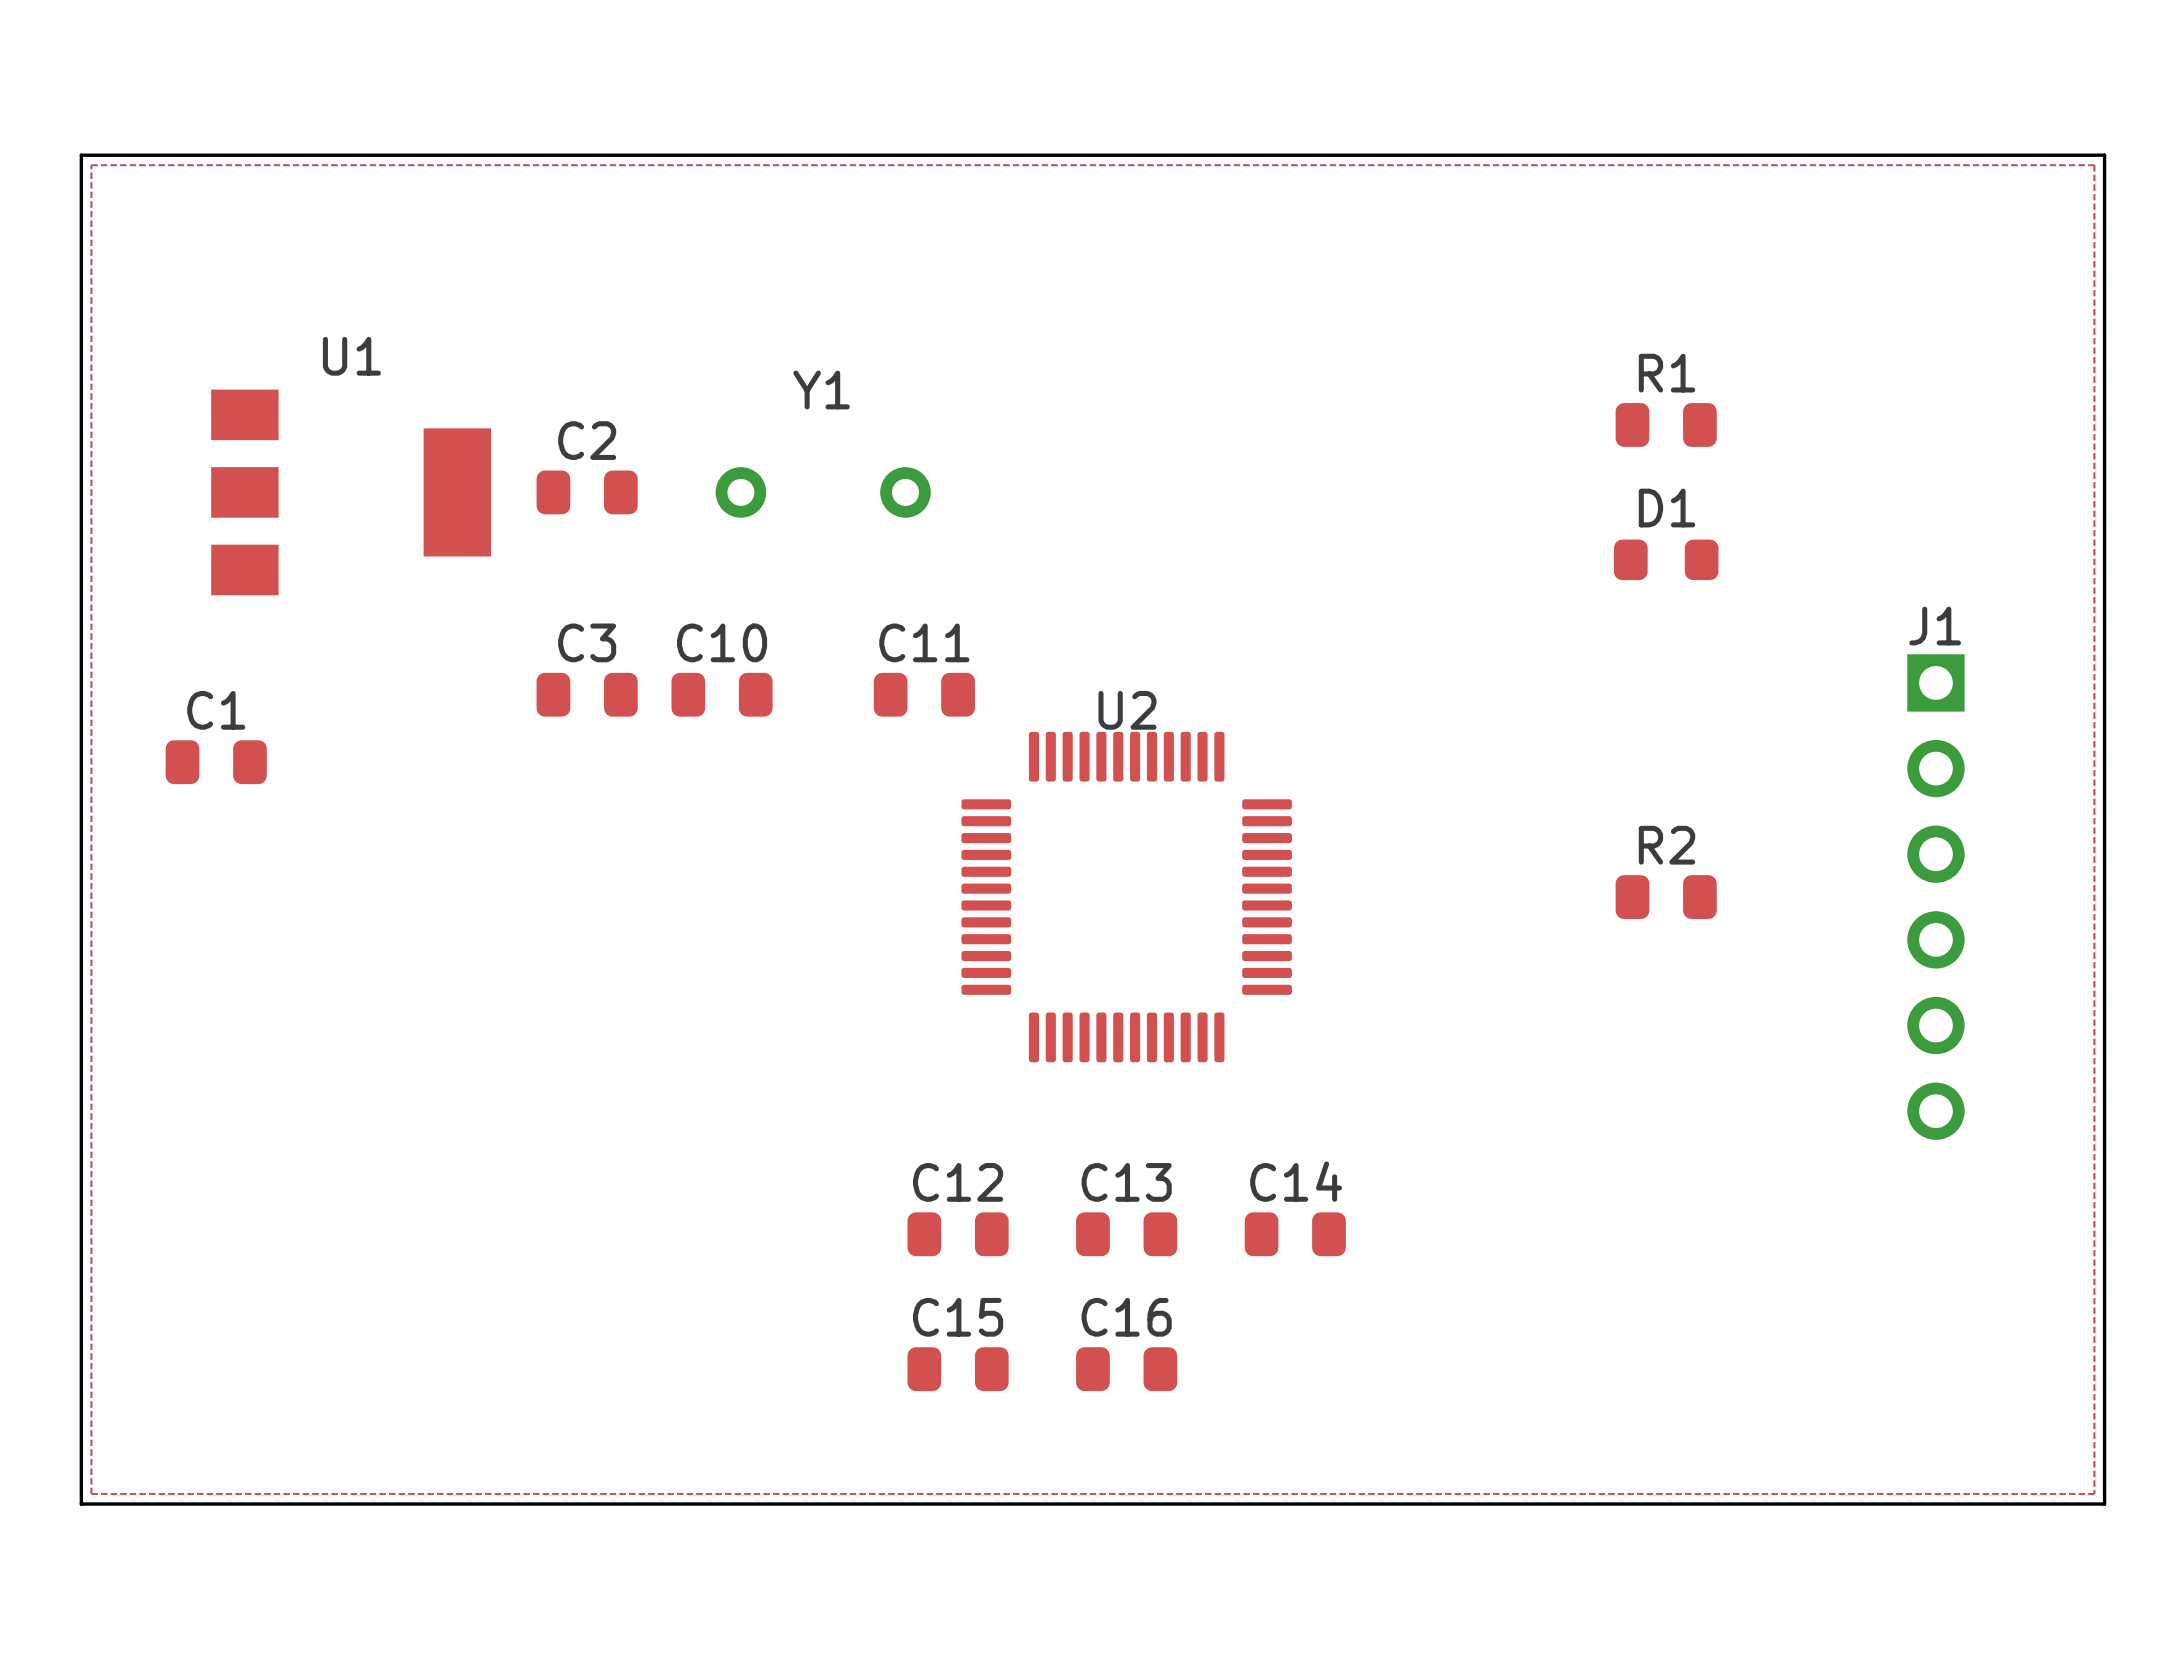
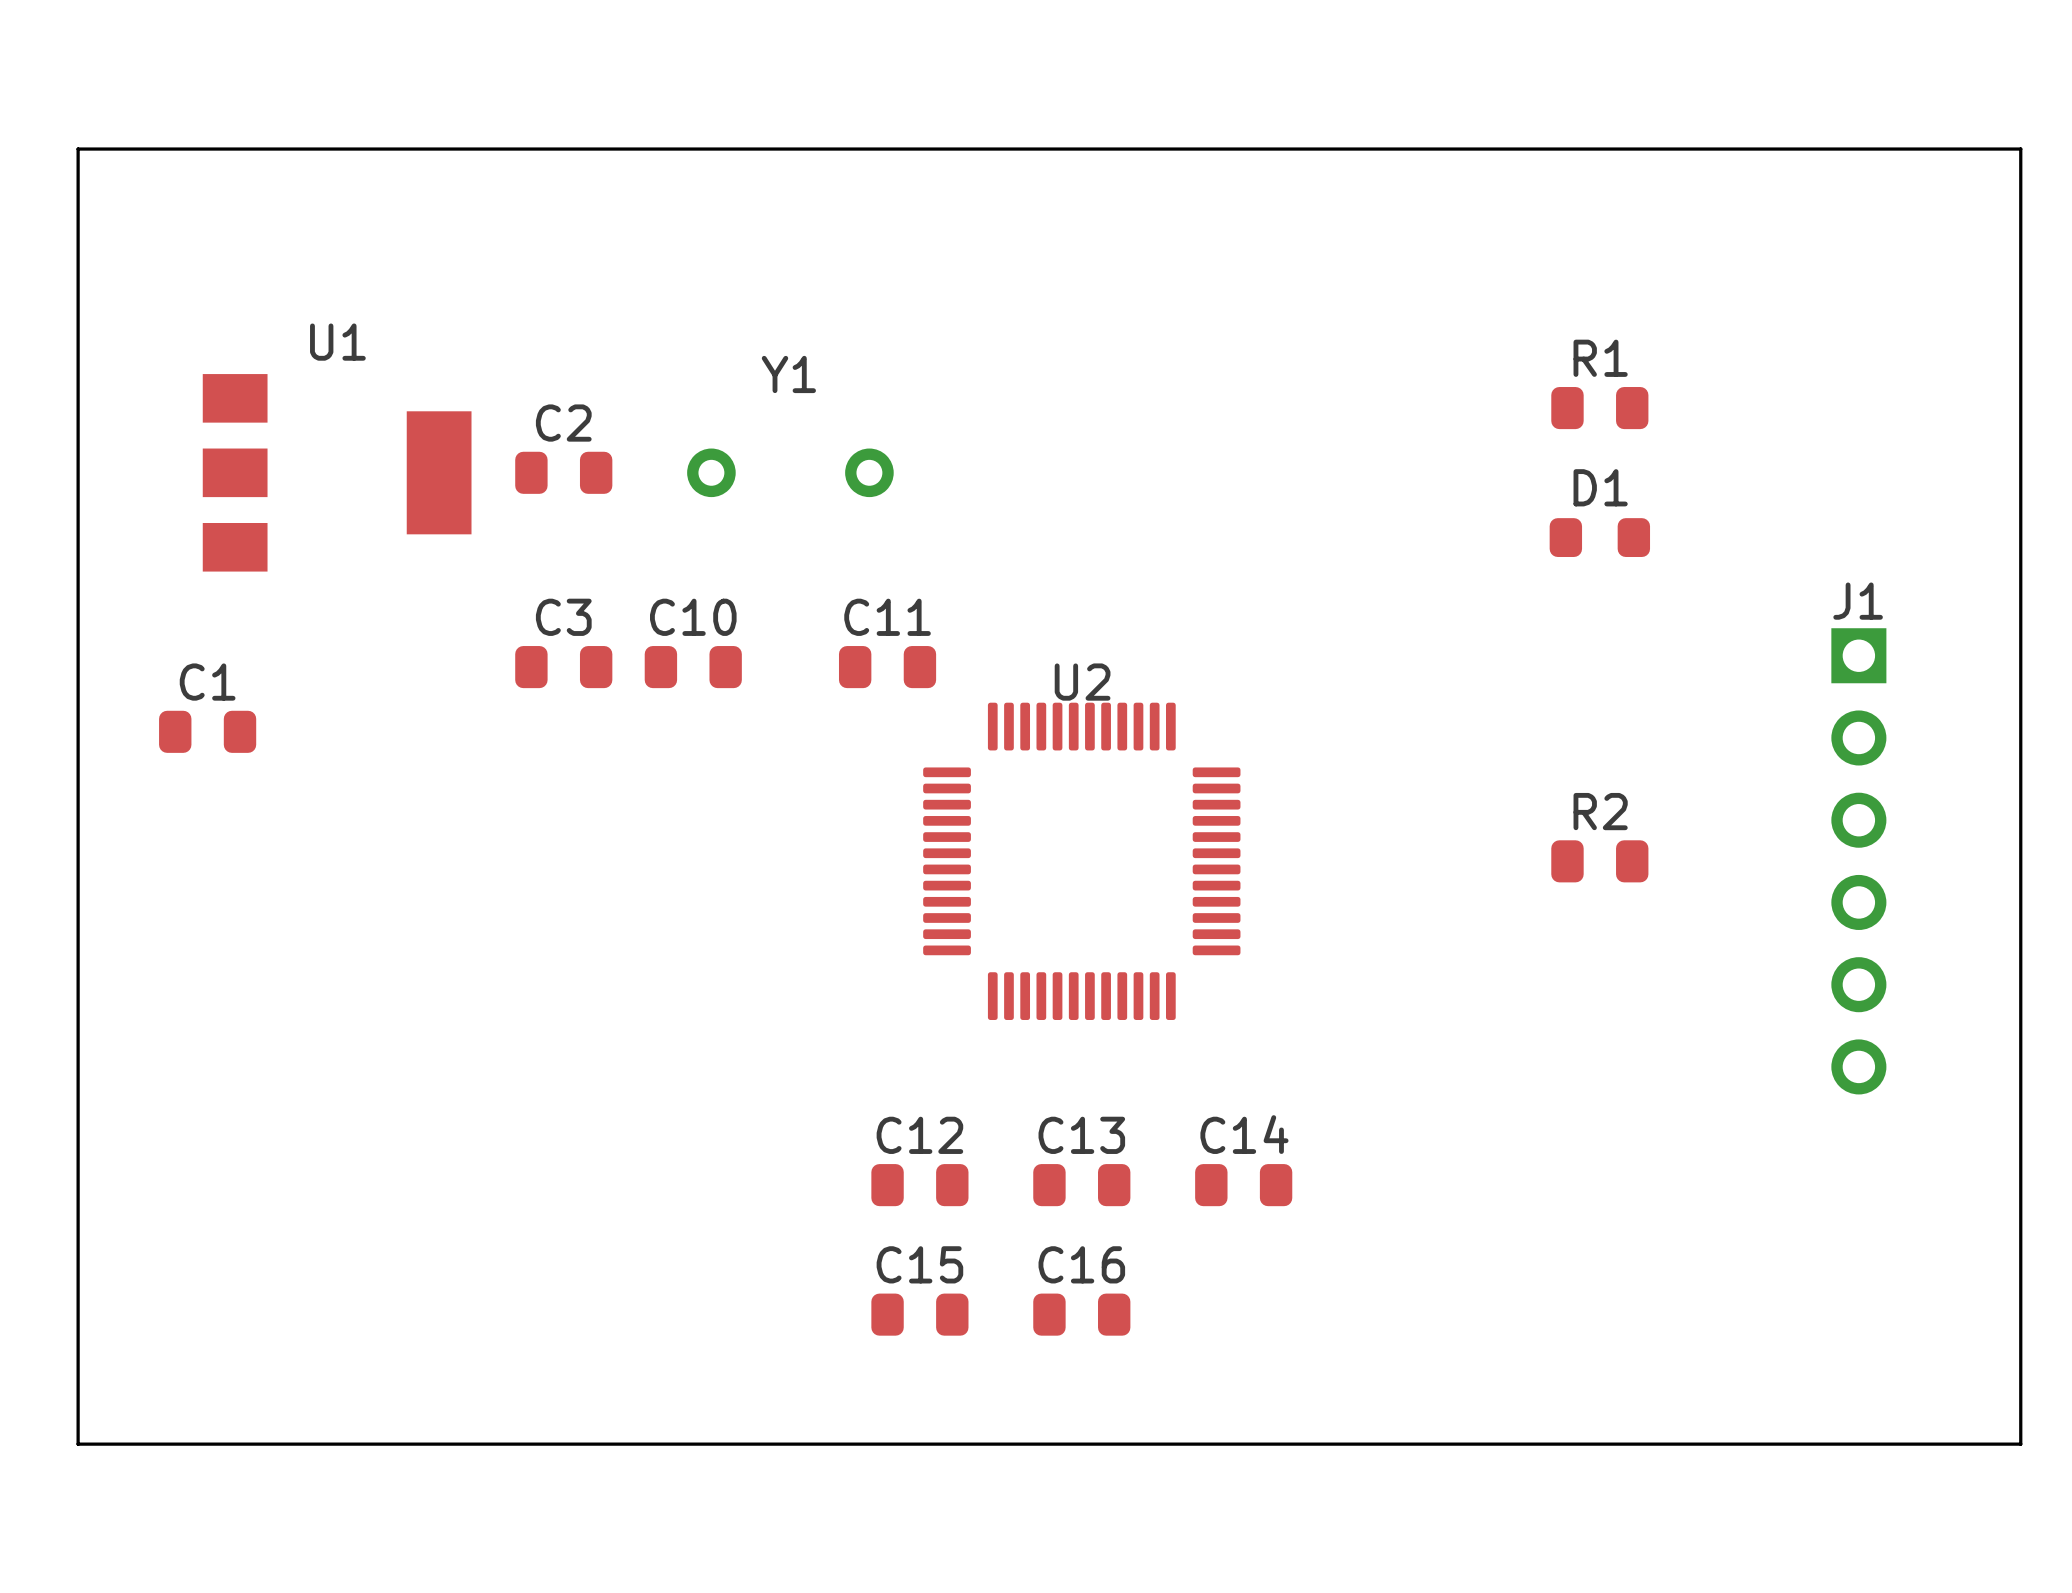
top zone outline: (91, 165) (2094, 165) (2094, 1493) (91, 1493) (91, 165) -> none

